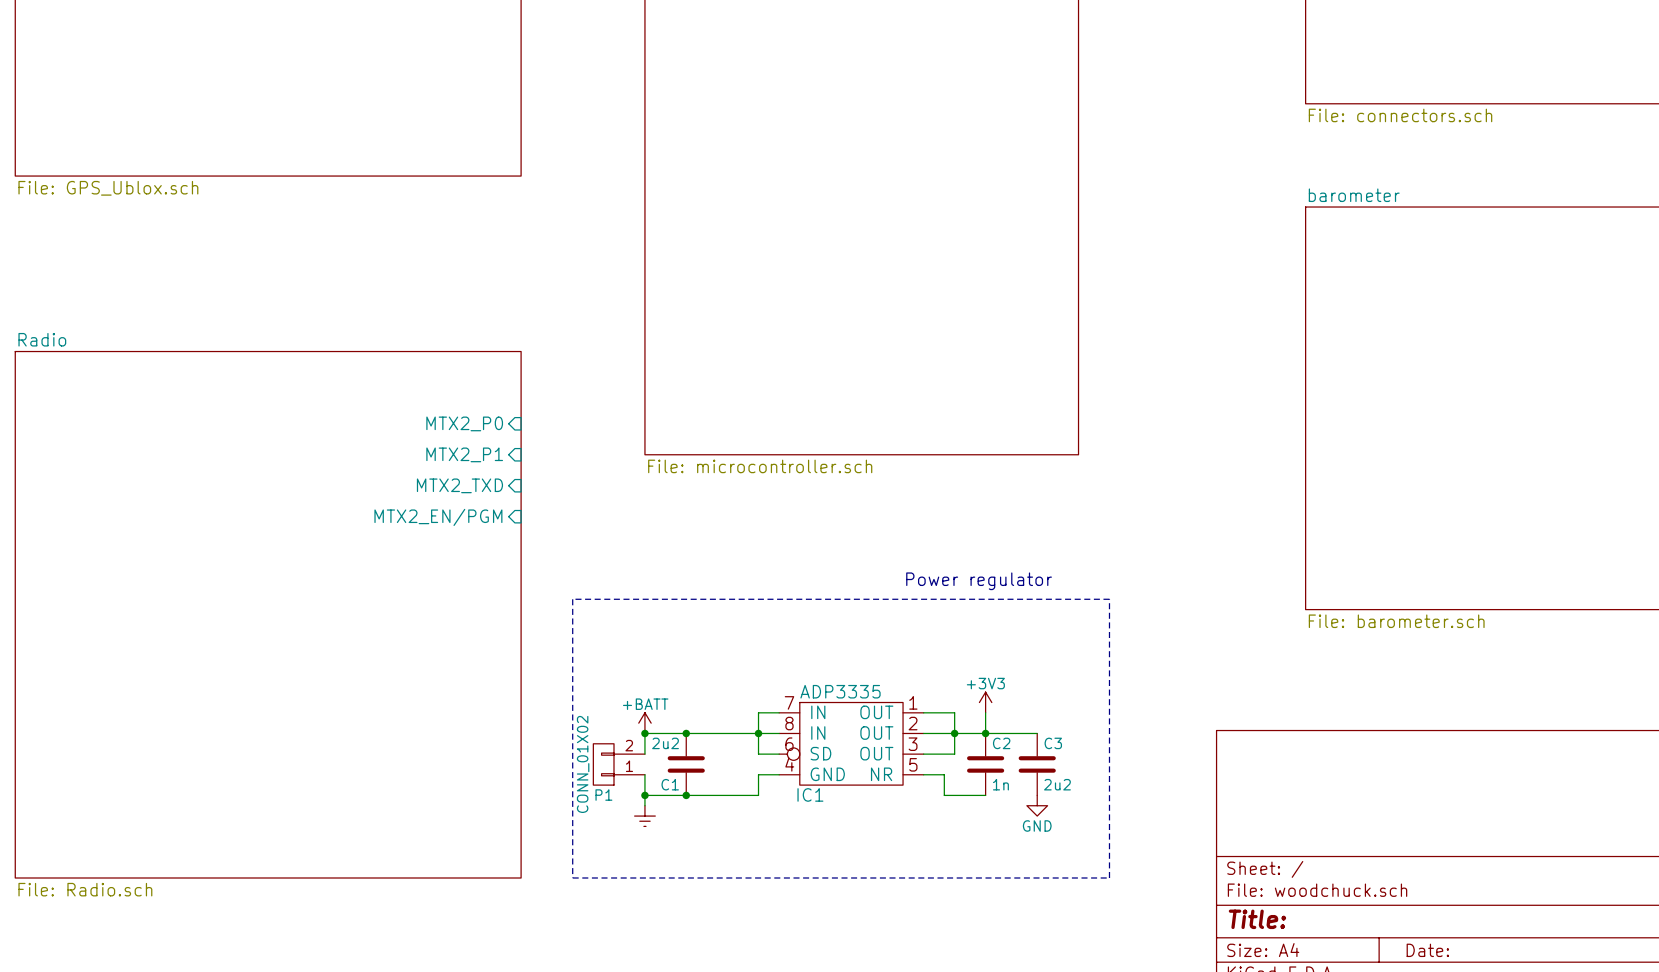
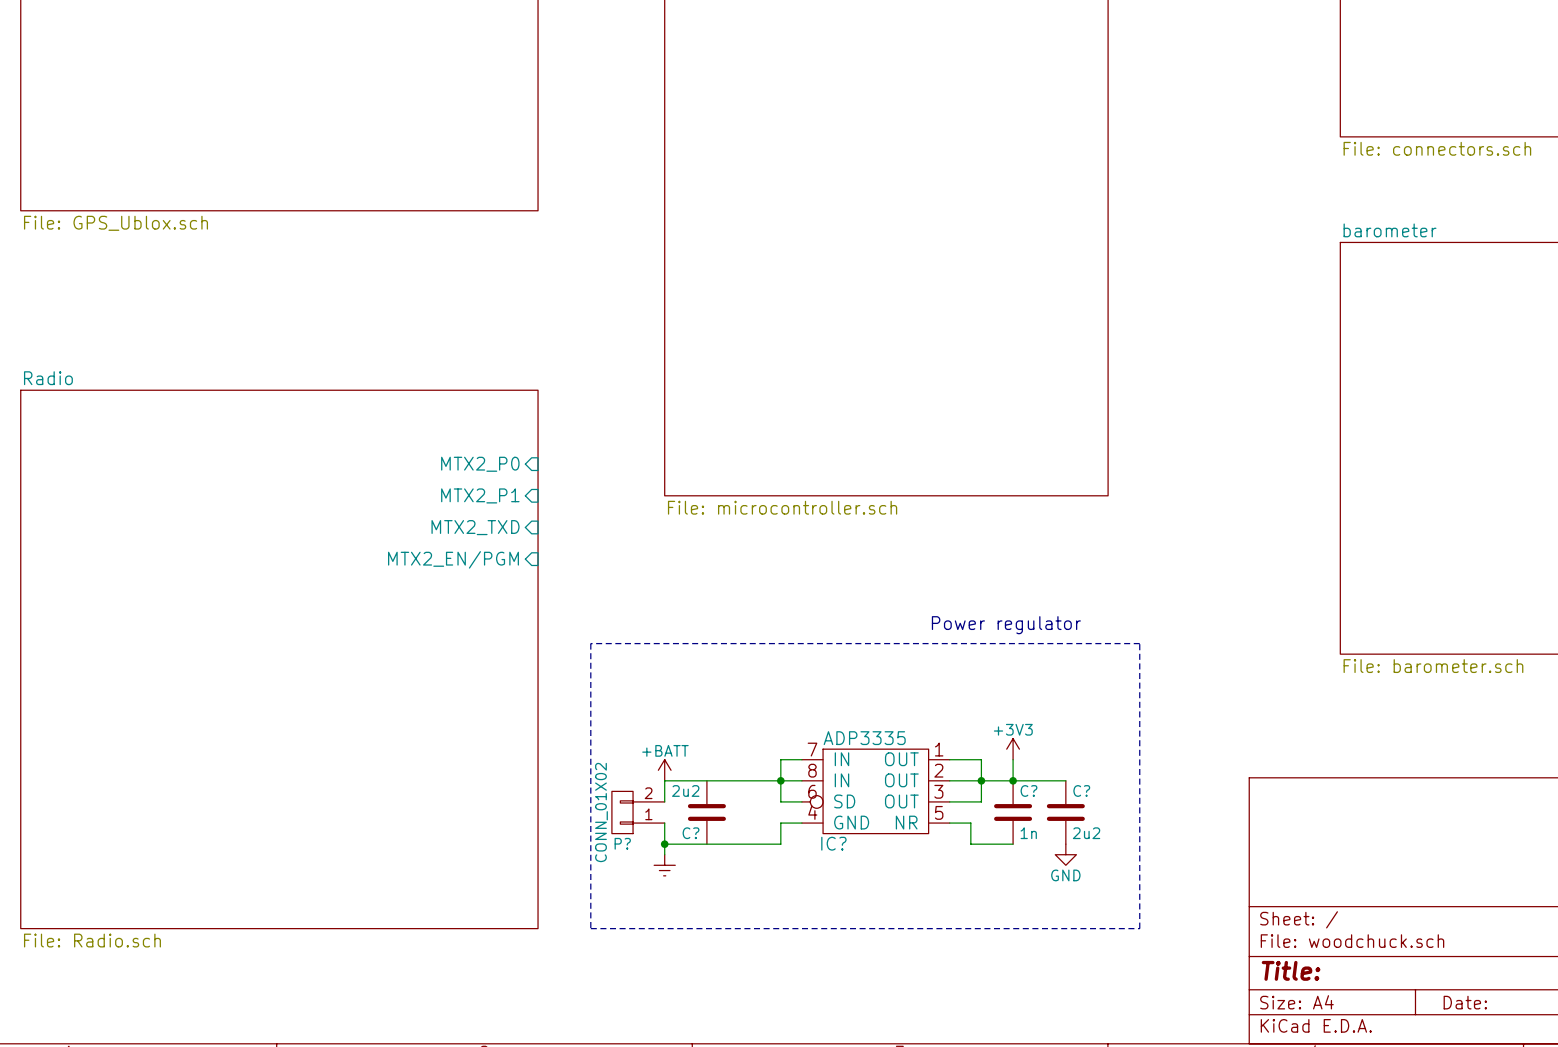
junction: (644, 733) -> none
junction: (686, 733) -> none
C2 name: C2 (1001, 743) -> C? (1028, 790)
C3 name: C3 (1053, 743) -> C? (1081, 790)
C1 name: C1 (670, 784) -> C? (691, 833)
IC1 name: IC1 (810, 794) -> IC? (833, 843)
P1 name: P1 (603, 795) -> P? (622, 843)
junction: (686, 795) -> none

